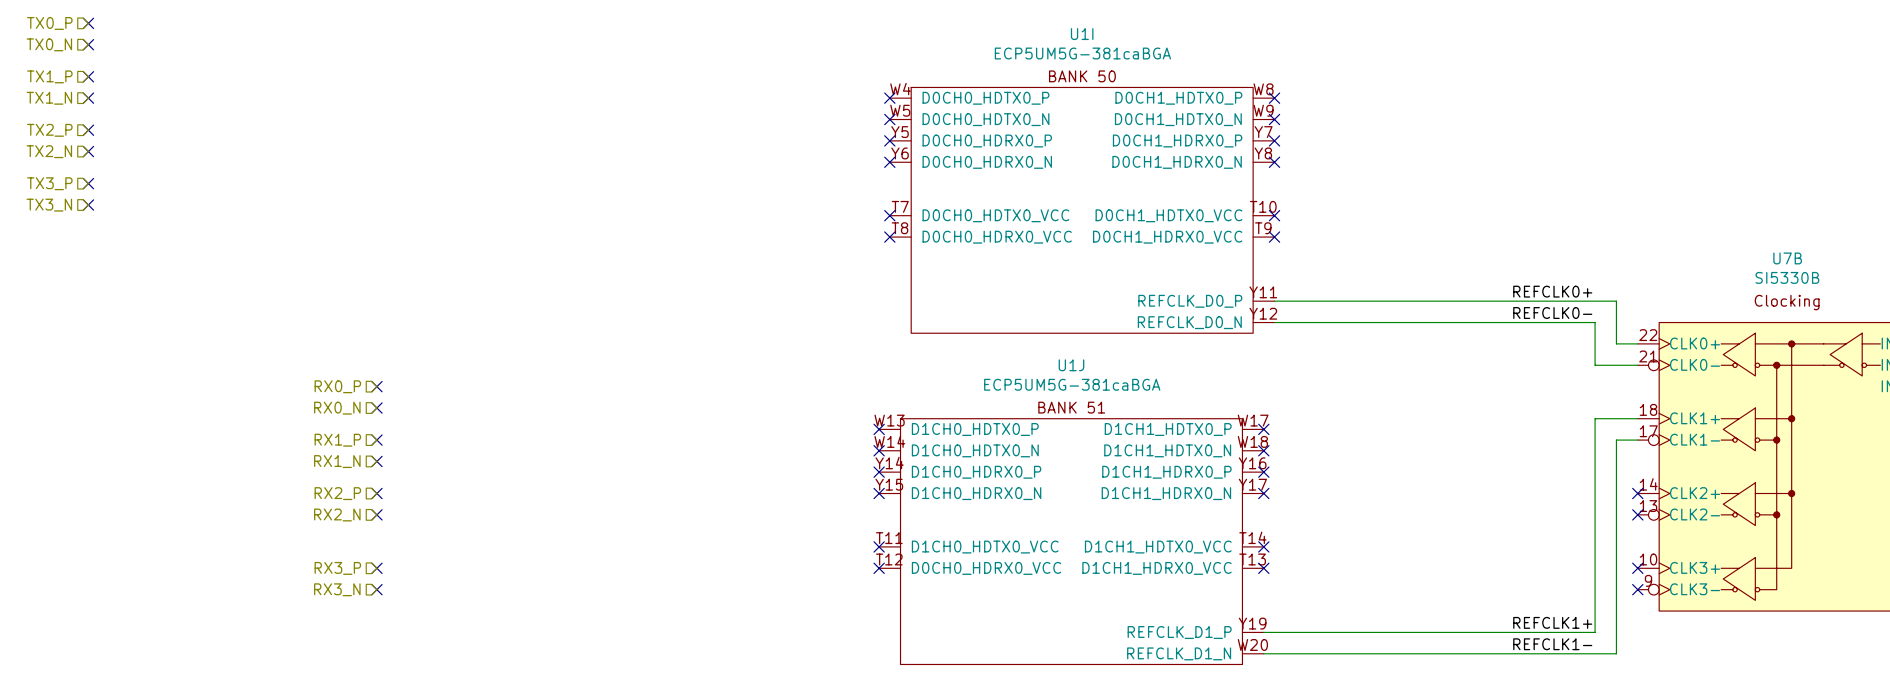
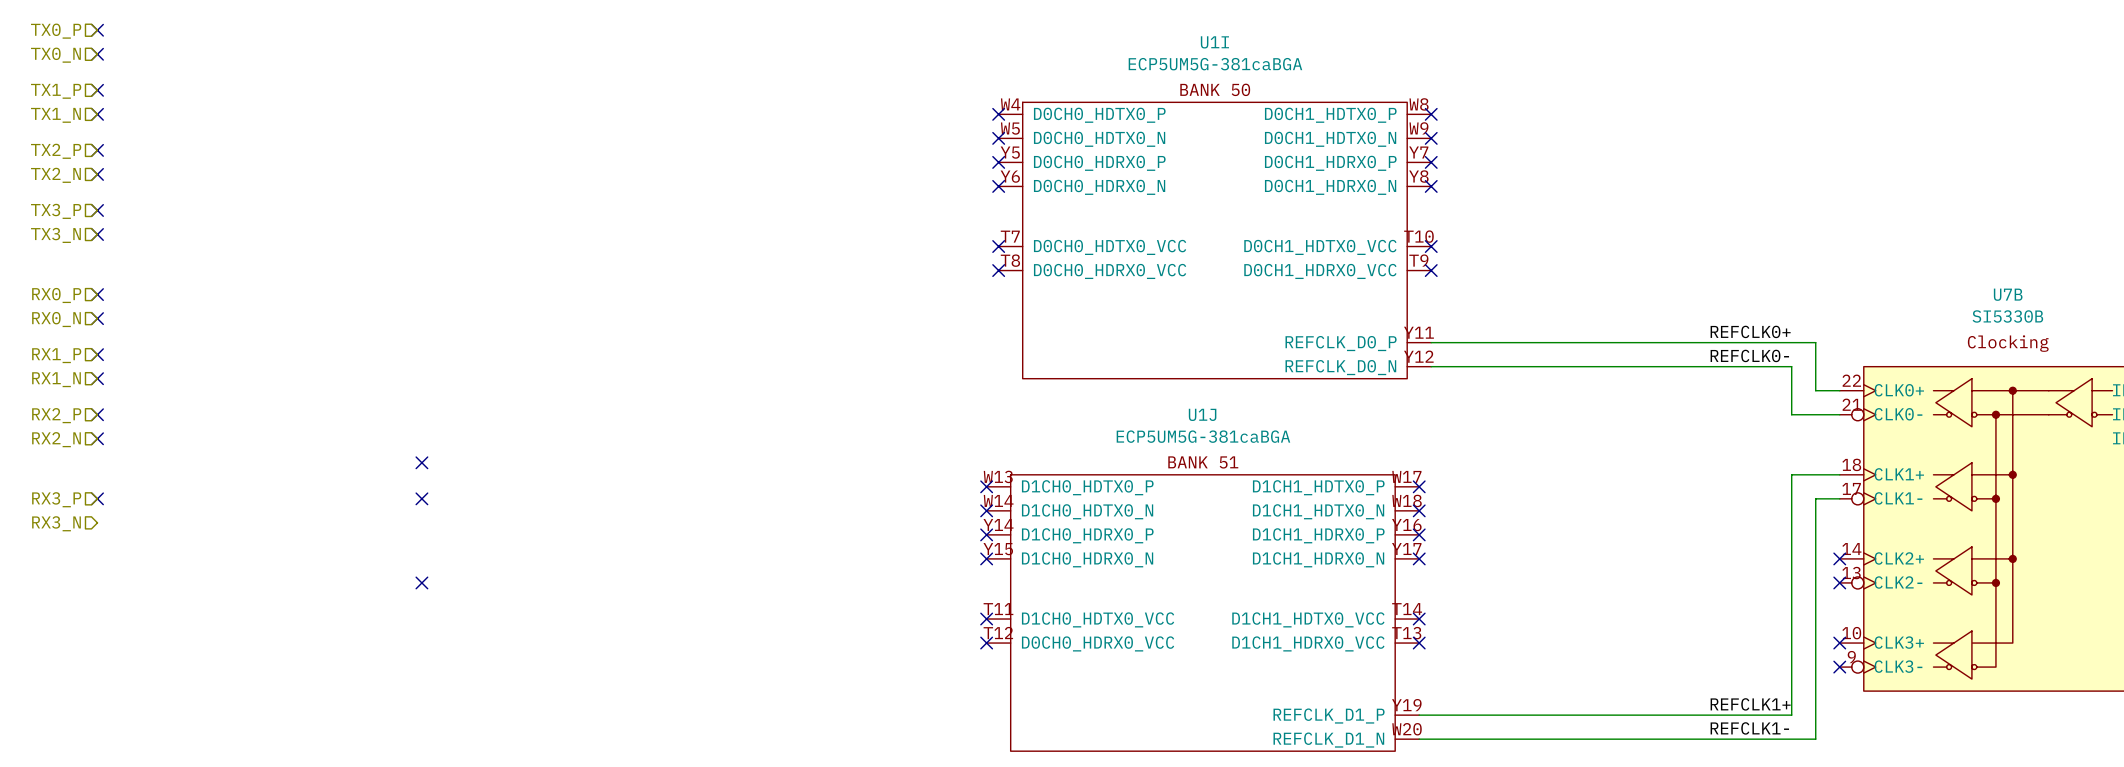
hierarchical label: none -> RX0_P (56, 295)
no-connect mark: none -> (97, 294)
hierarchical label: none -> RX0_N (56, 319)
no-connect mark: none -> (97, 318)
hierarchical label: none -> RX1_P (56, 355)
no-connect mark: none -> (97, 354)
hierarchical label: none -> RX1_N (56, 379)
no-connect mark: none -> (97, 378)
hierarchical label: none -> RX2_P (56, 415)
no-connect mark: none -> (97, 414)
hierarchical label: none -> RX2_N (56, 439)
no-connect mark: none -> (97, 438)
hierarchical label: RX0_P (337, 386) -> none
no-connect mark: (376, 386) -> none
hierarchical label: RX0_N (337, 408) -> none
hierarchical label: none -> RX3_P (56, 499)
no-connect mark: none -> (97, 498)
hierarchical label: RX1_P (337, 440) -> none
hierarchical label: none -> RX3_N (56, 523)
hierarchical label: RX1_N (337, 461) -> none
no-connect mark: (376, 461) -> none
hierarchical label: RX2_P (337, 493) -> none
no-connect mark: (376, 493) -> none
hierarchical label: RX2_N (337, 514) -> none
hierarchical label: RX3_P (337, 568) -> none
no-connect mark: (376, 568) -> none
hierarchical label: RX3_N (337, 589) -> none
no-connect mark: (376, 589) -> none

